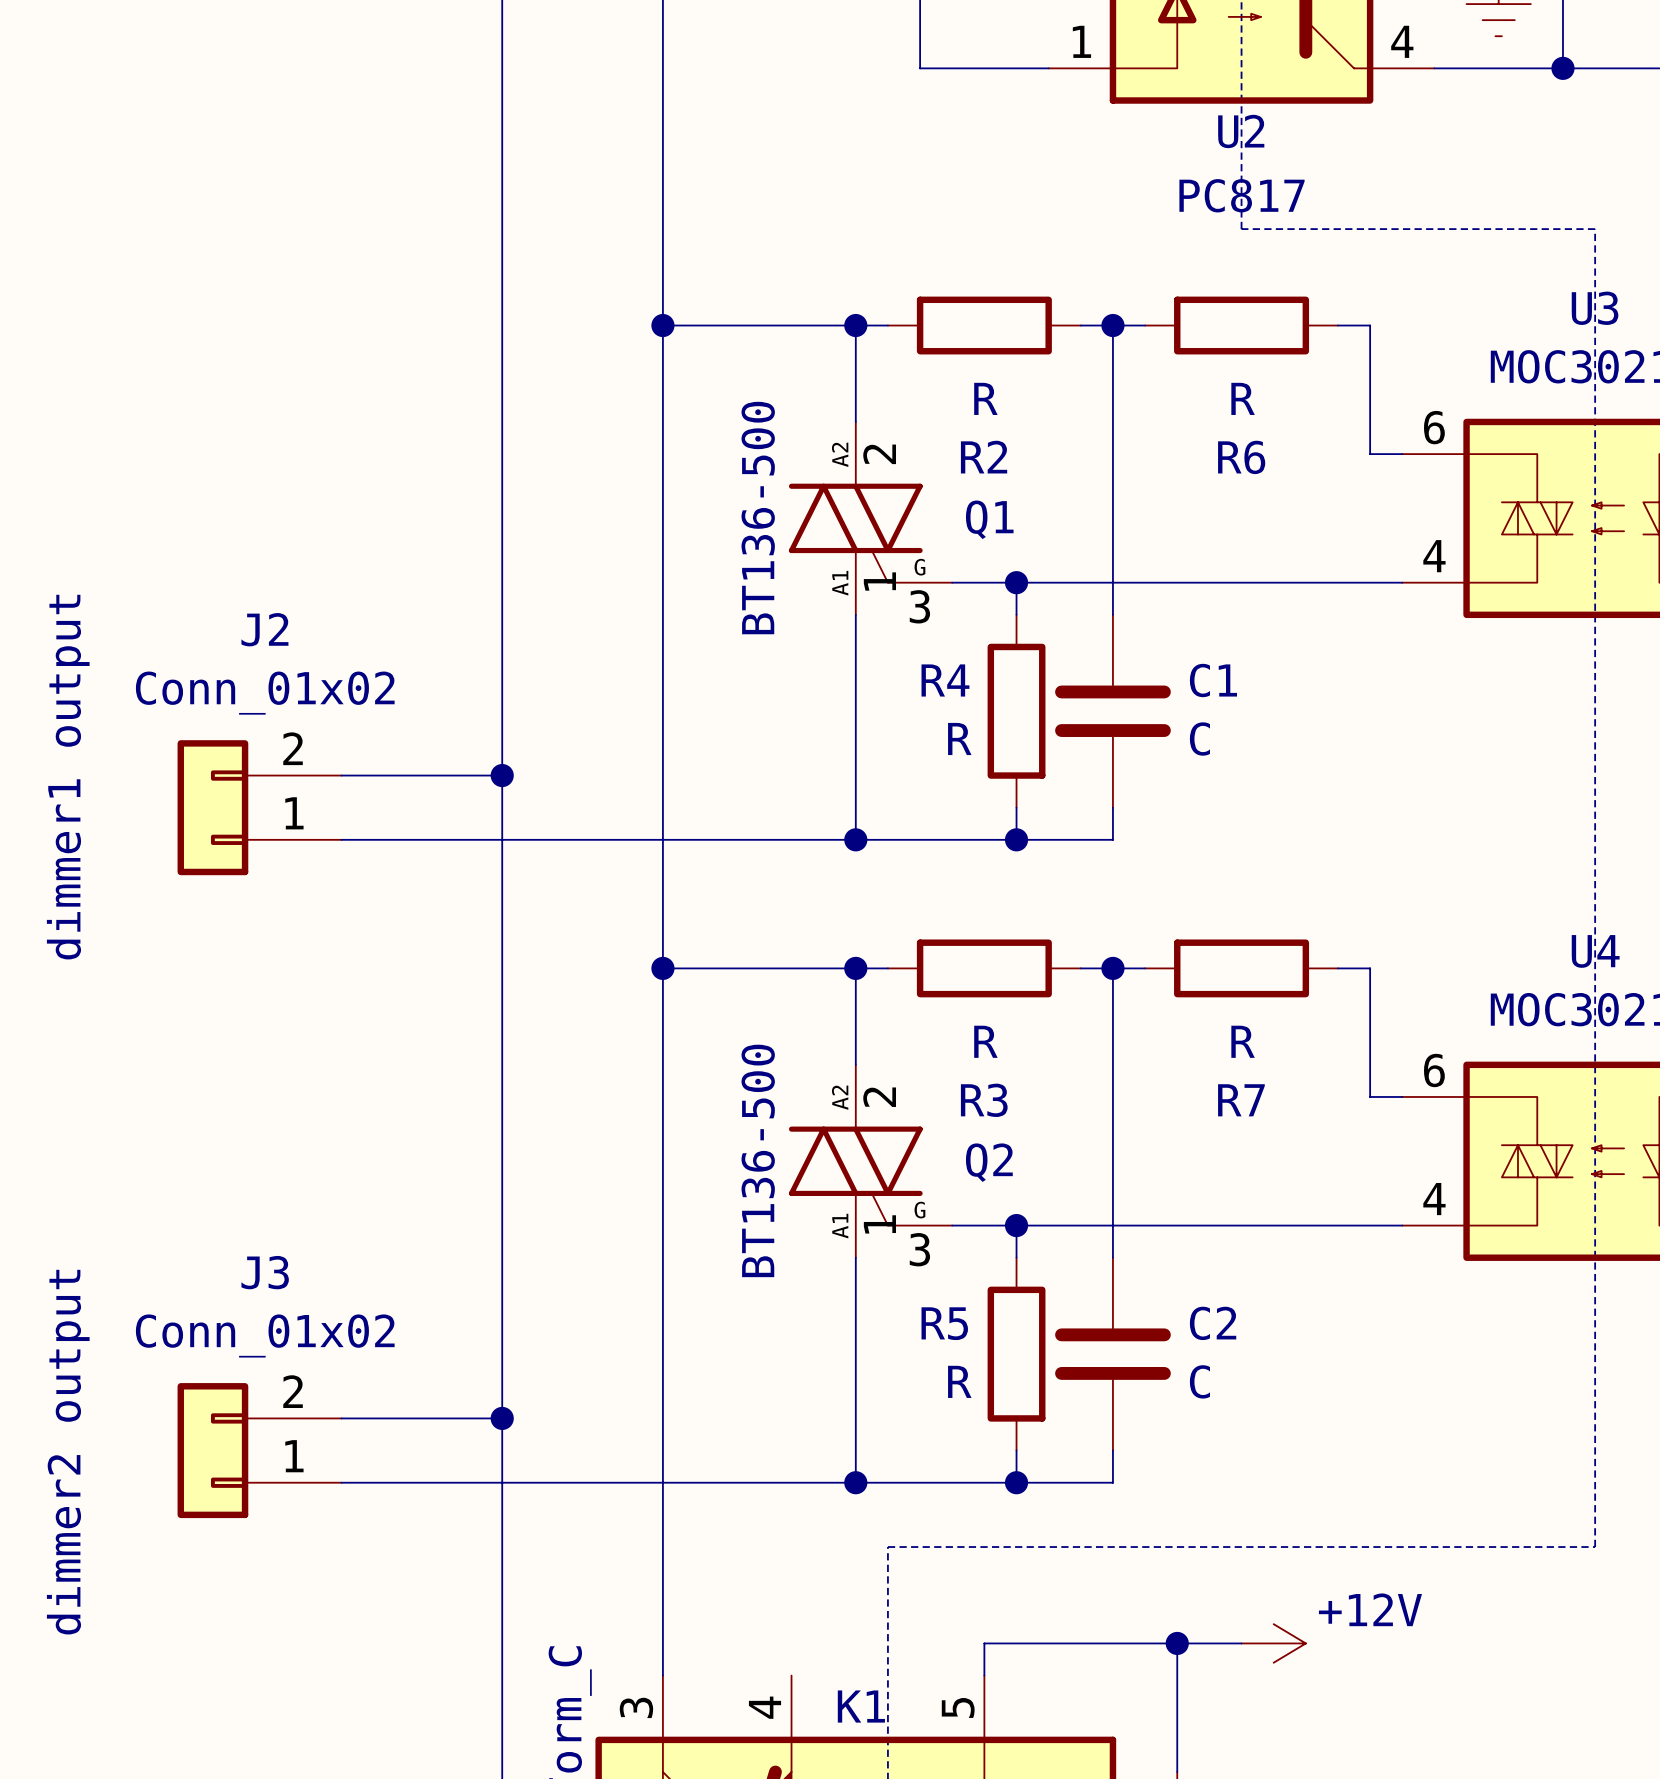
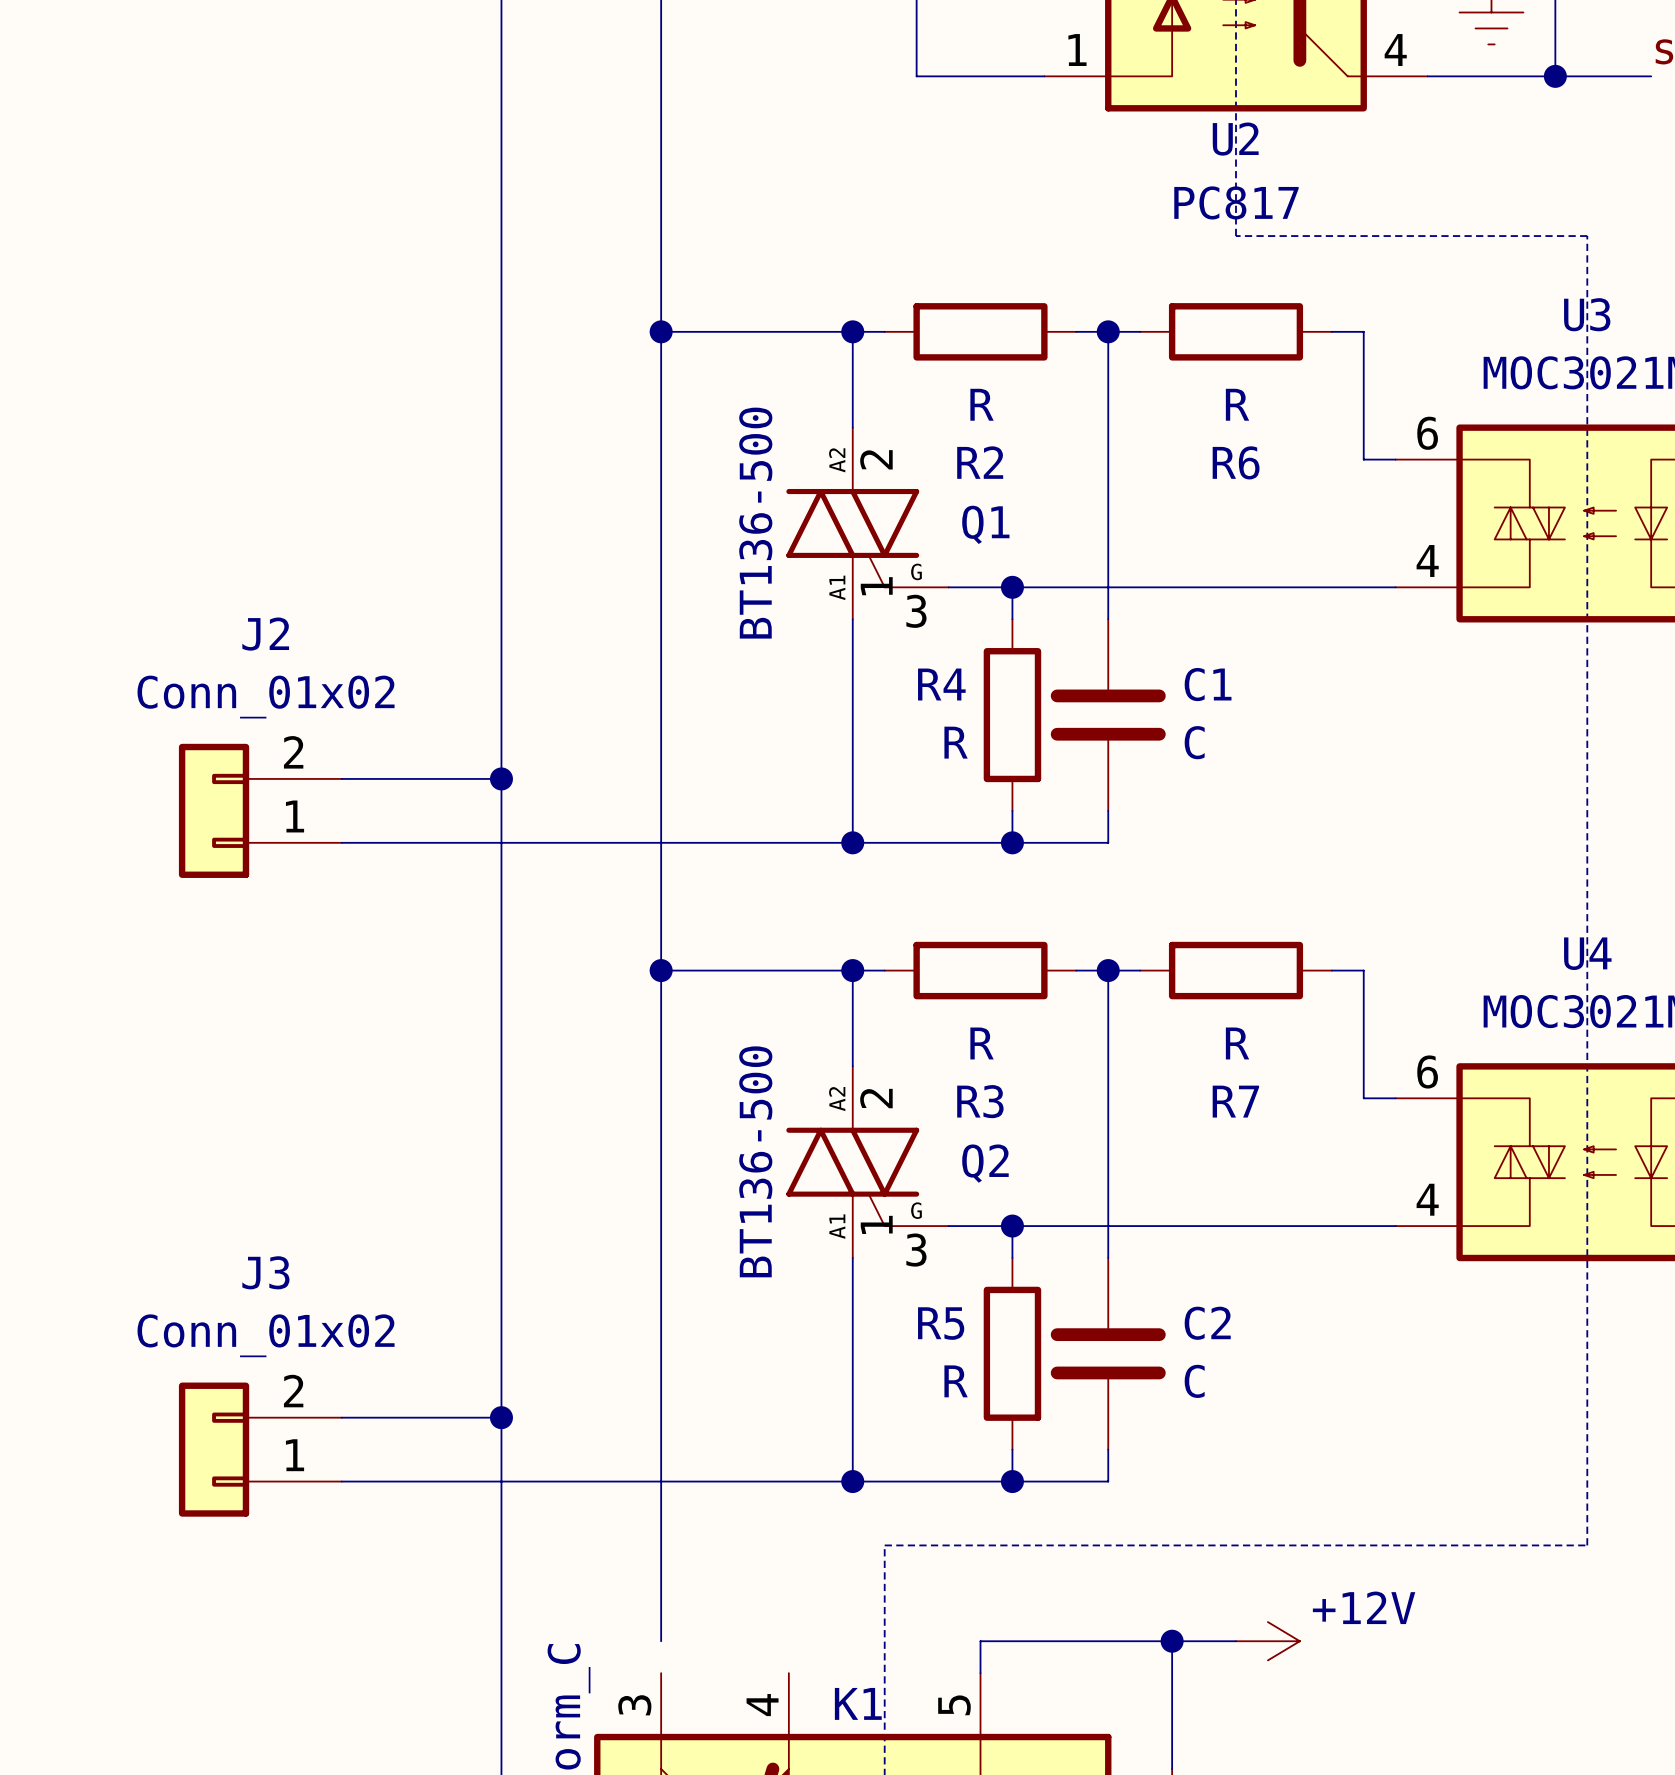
text: dimmer1 output (68, 777) -> none
text: dimmer2 output (68, 1452) -> none
wire: (662, 1643) (662, 1675) -> none

